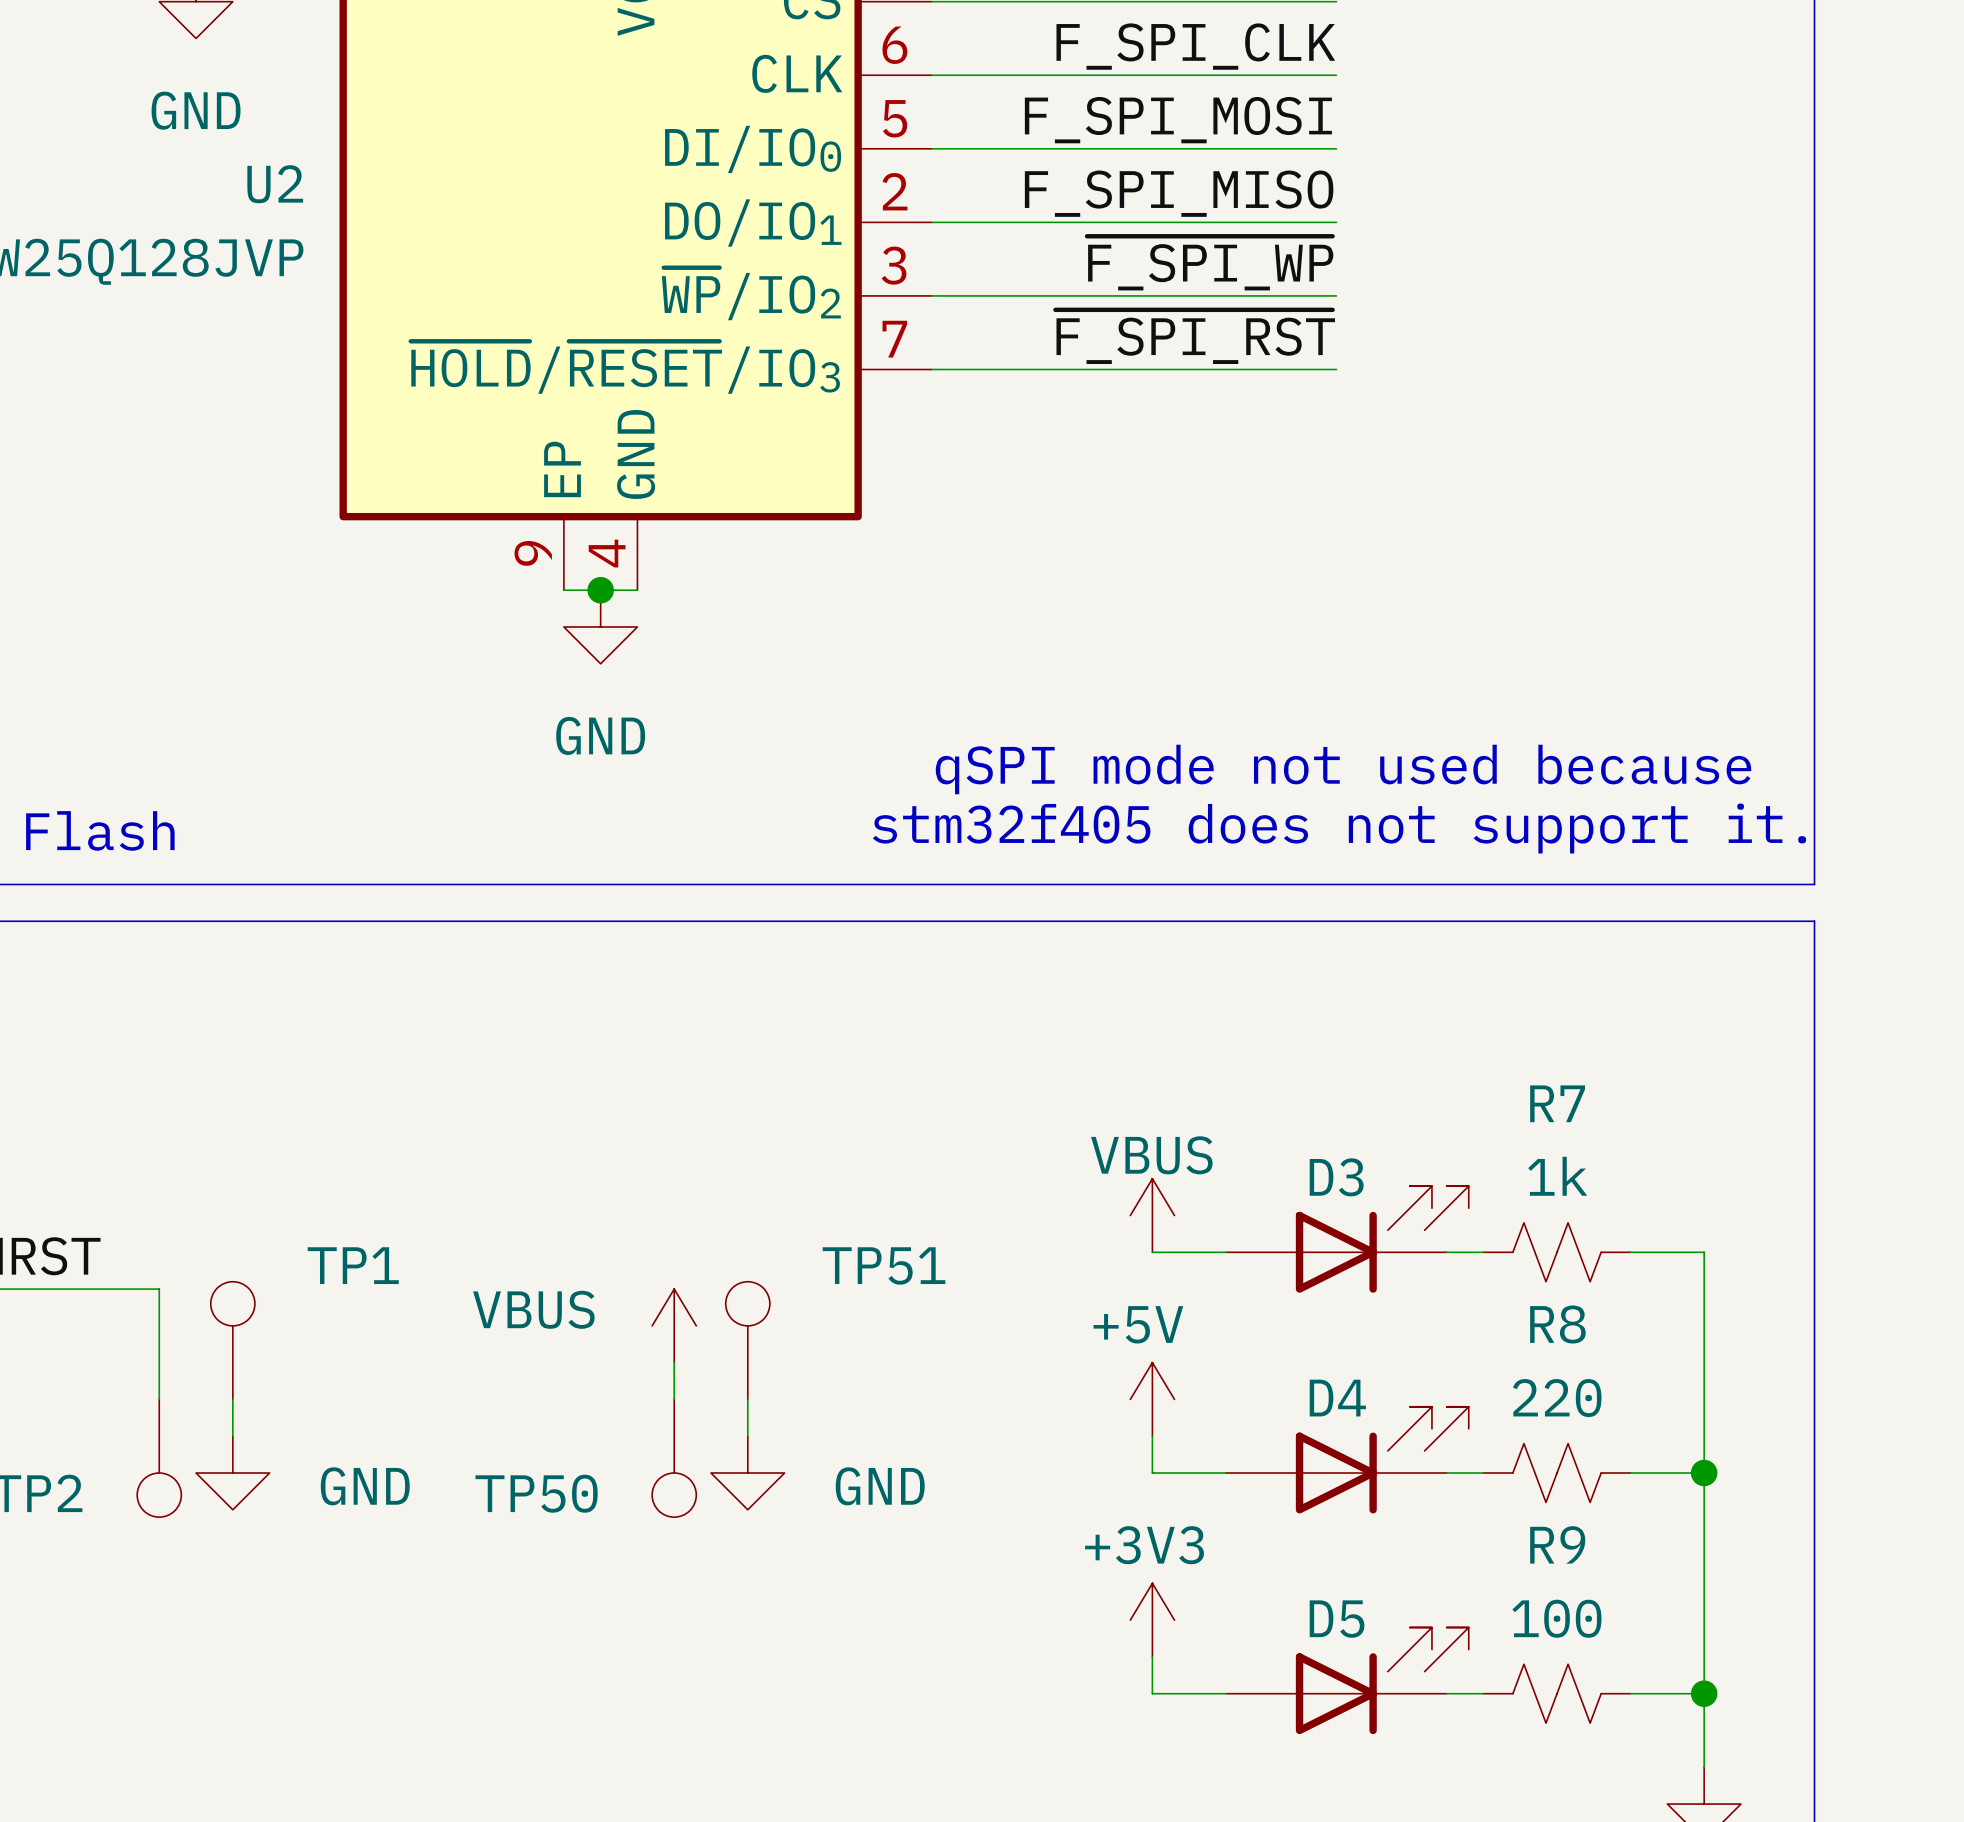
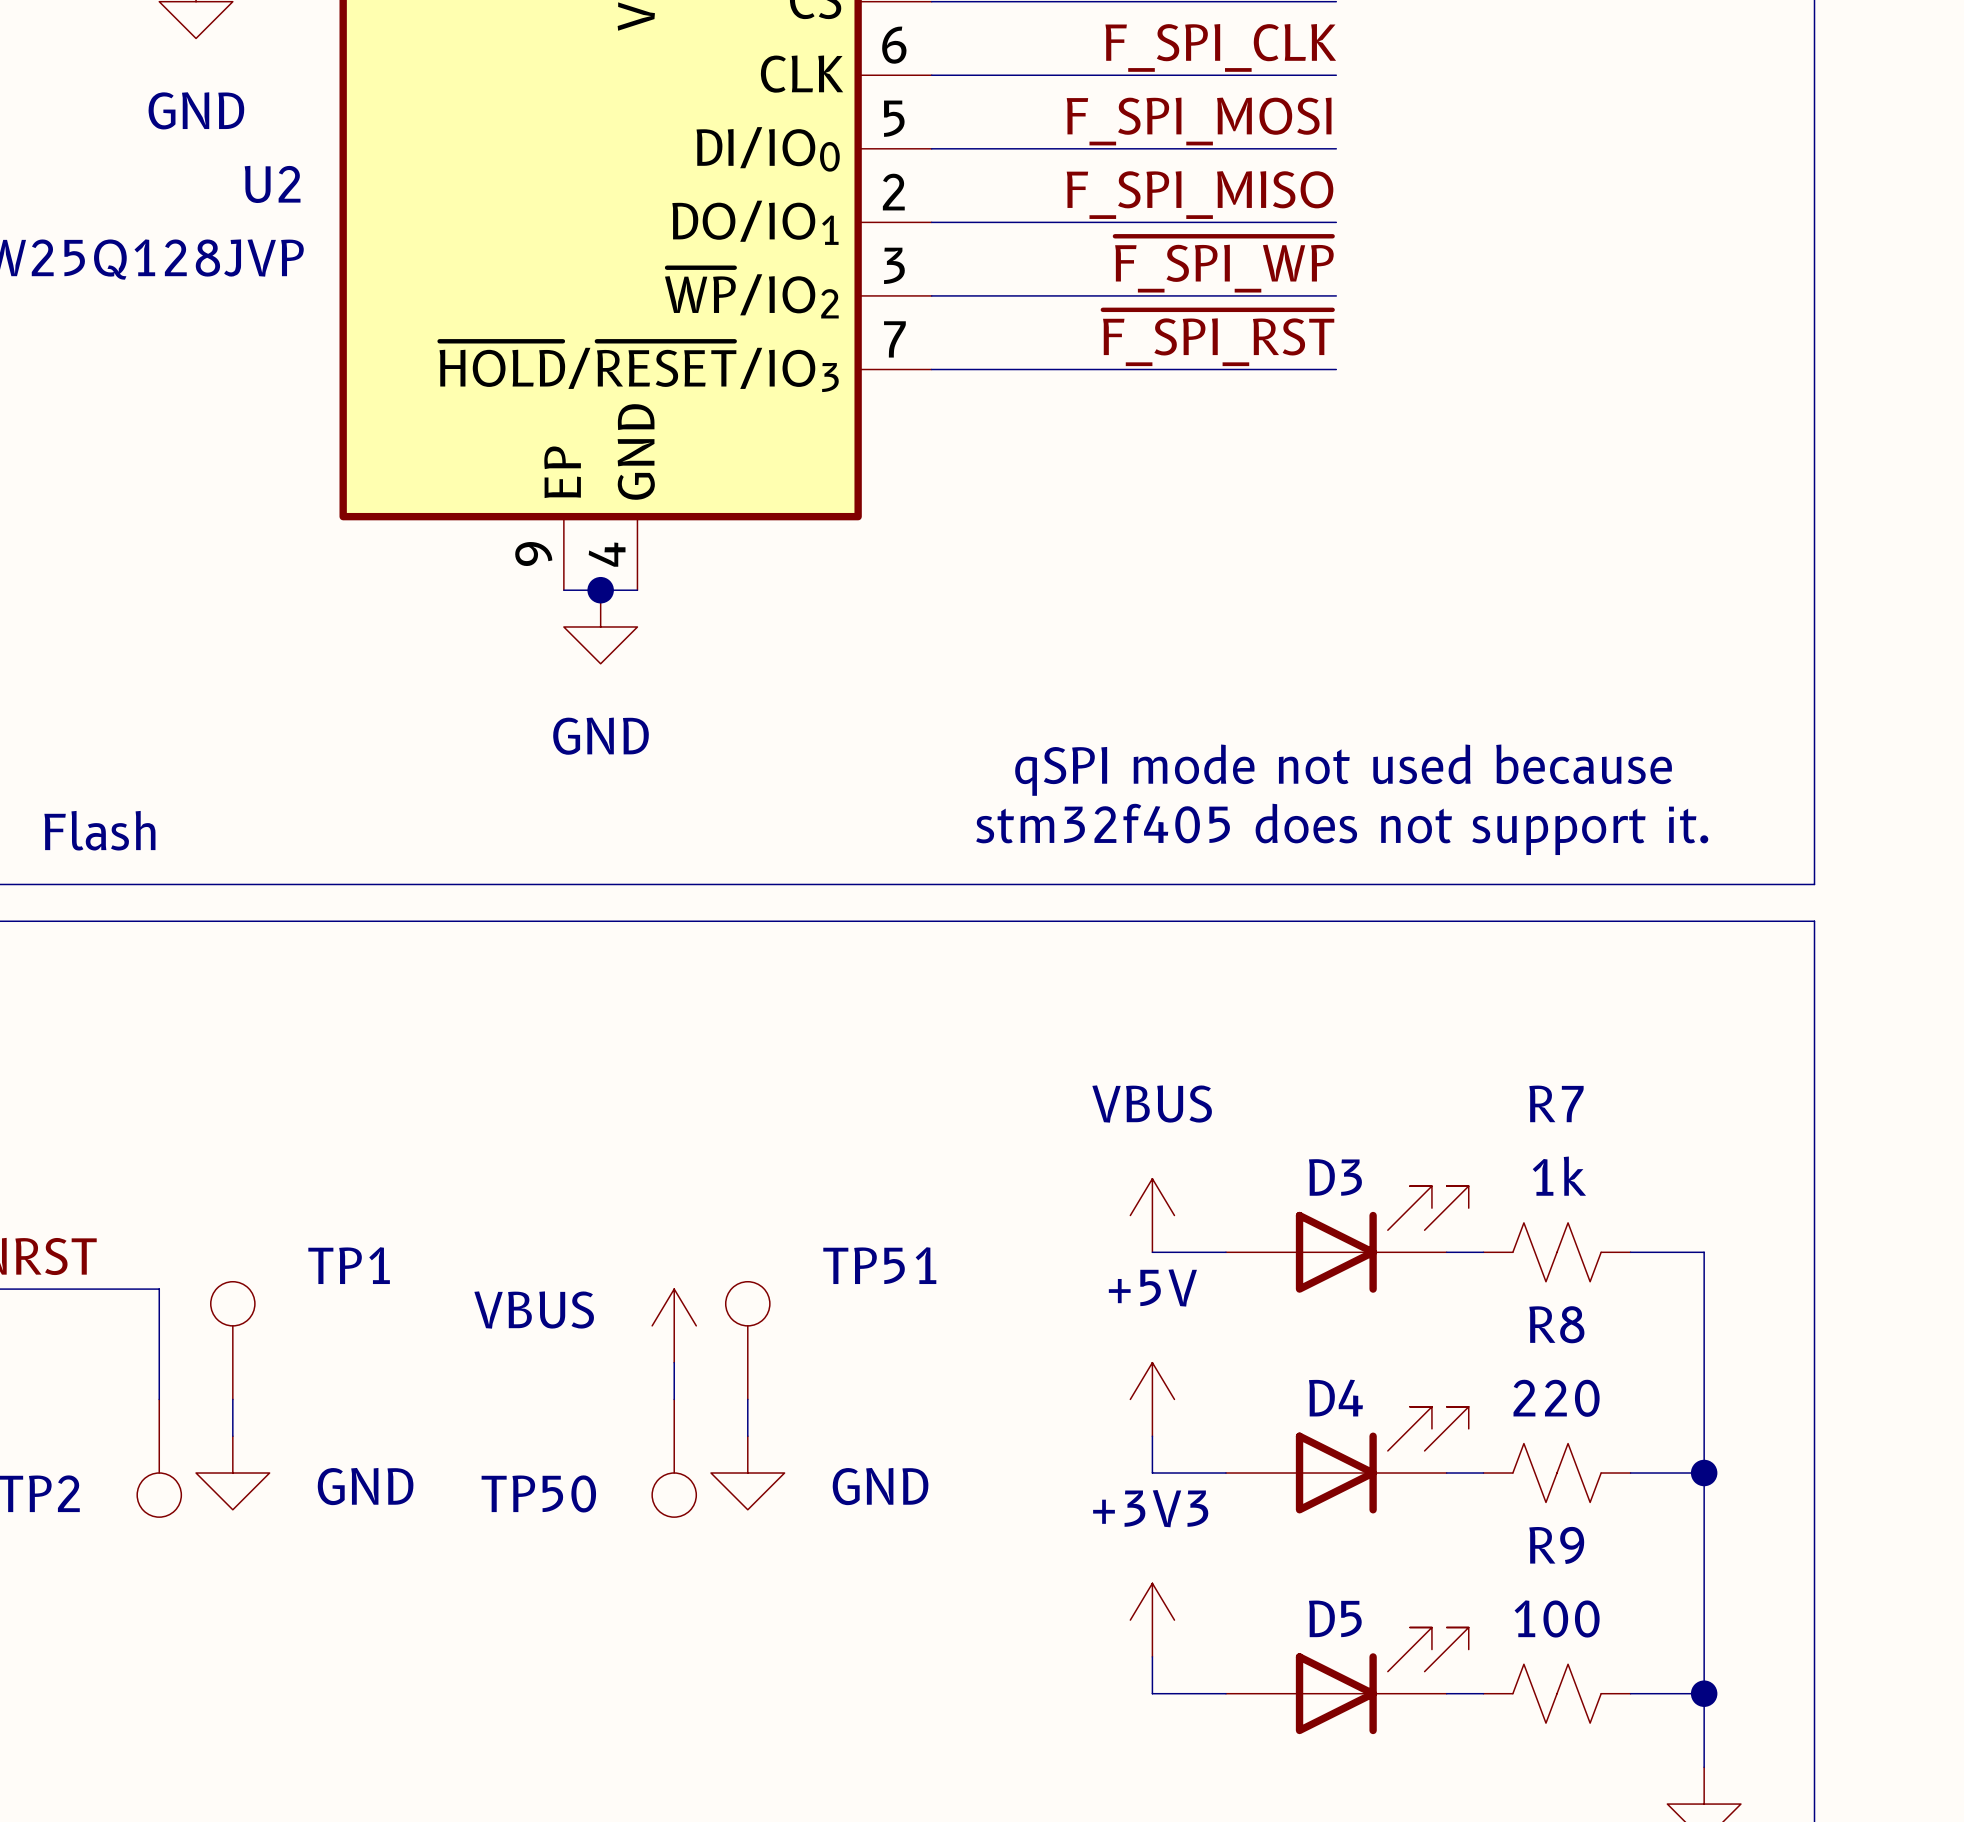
power symbol text position: VBUS (1151, 1155) -> VBUS (1152, 1104)
power symbol text position: +5V (1138, 1324) -> +5V (1152, 1287)
power symbol text position: +3V3 (1144, 1545) -> +3V3 (1150, 1508)

